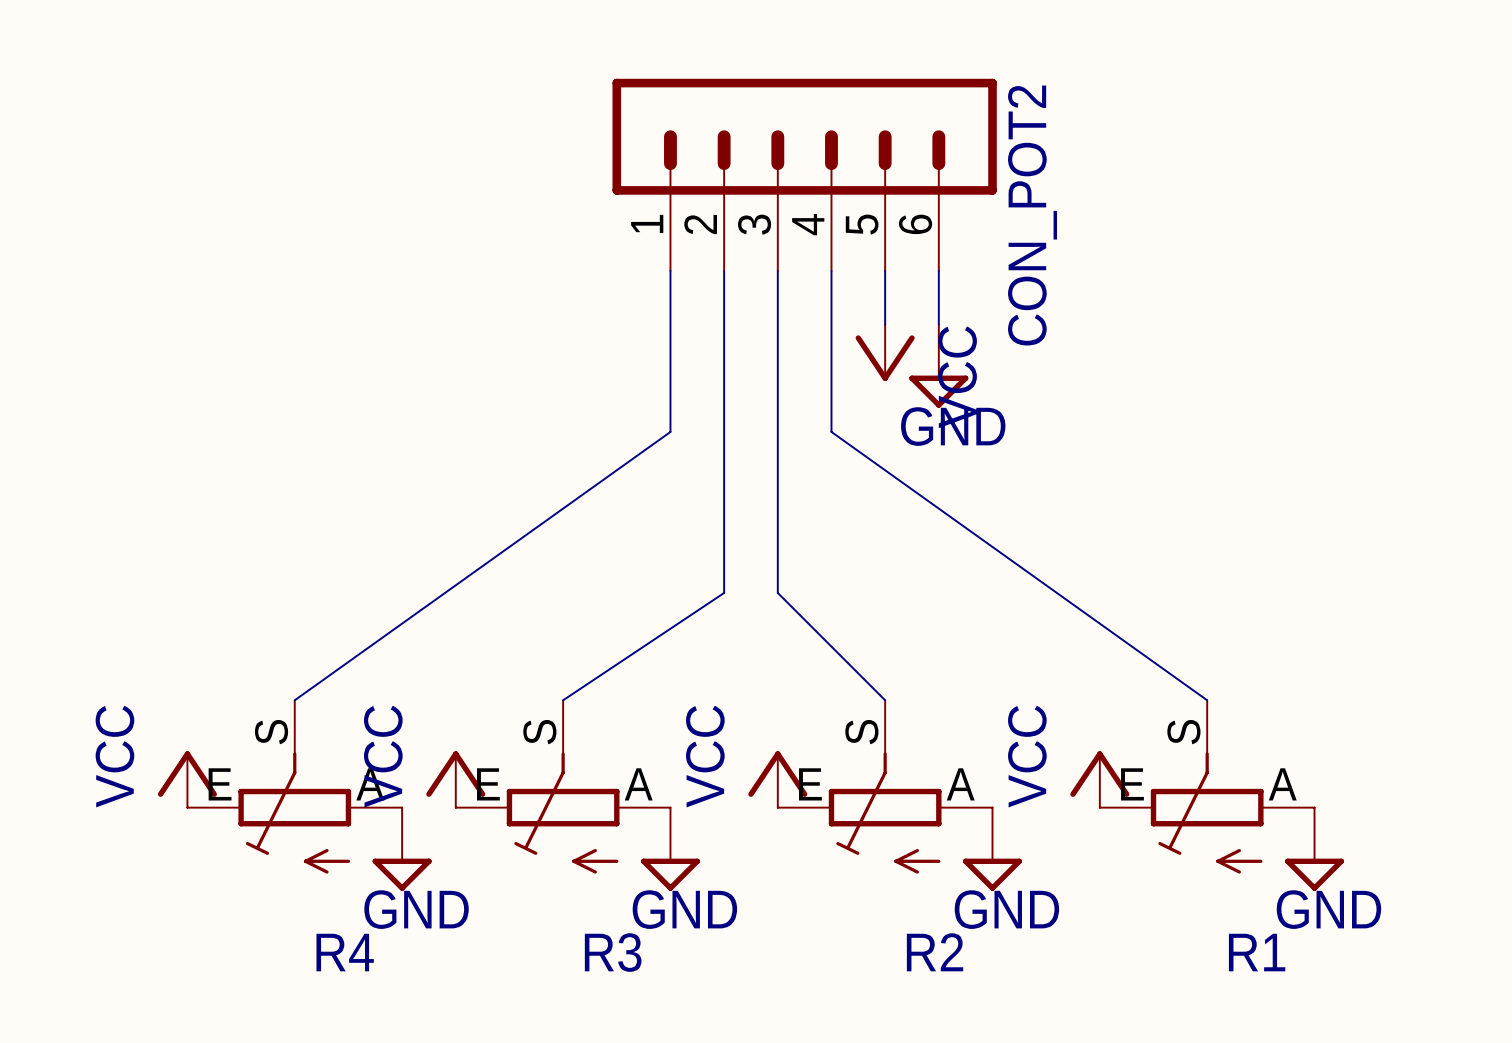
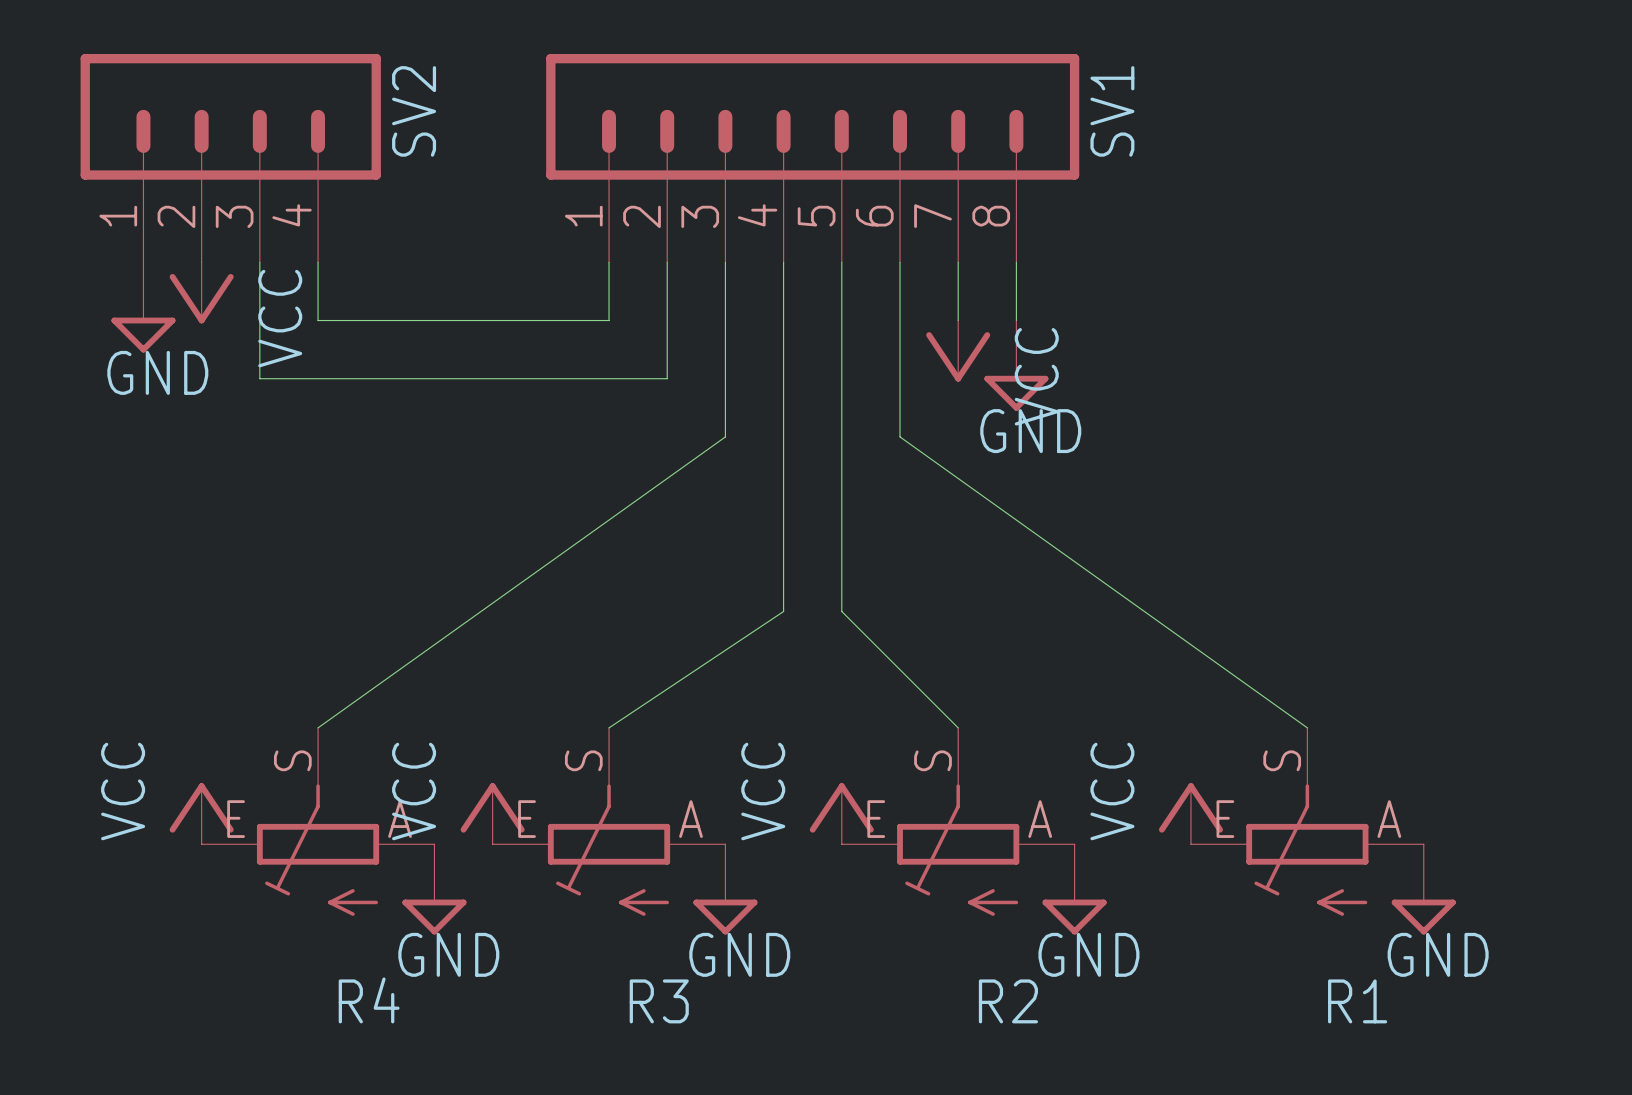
SV2: none -> (230, 158)
SV1: none -> (812, 158)
CON_POT2: (804, 174) -> none
wire: none -> (259, 262) (259, 378) (667, 378) (667, 262)
wire: none -> (318, 262) (318, 320) (609, 320) (609, 262)
power symbol: none -> VCC (201, 292)
power symbol: none -> GND (143, 307)

